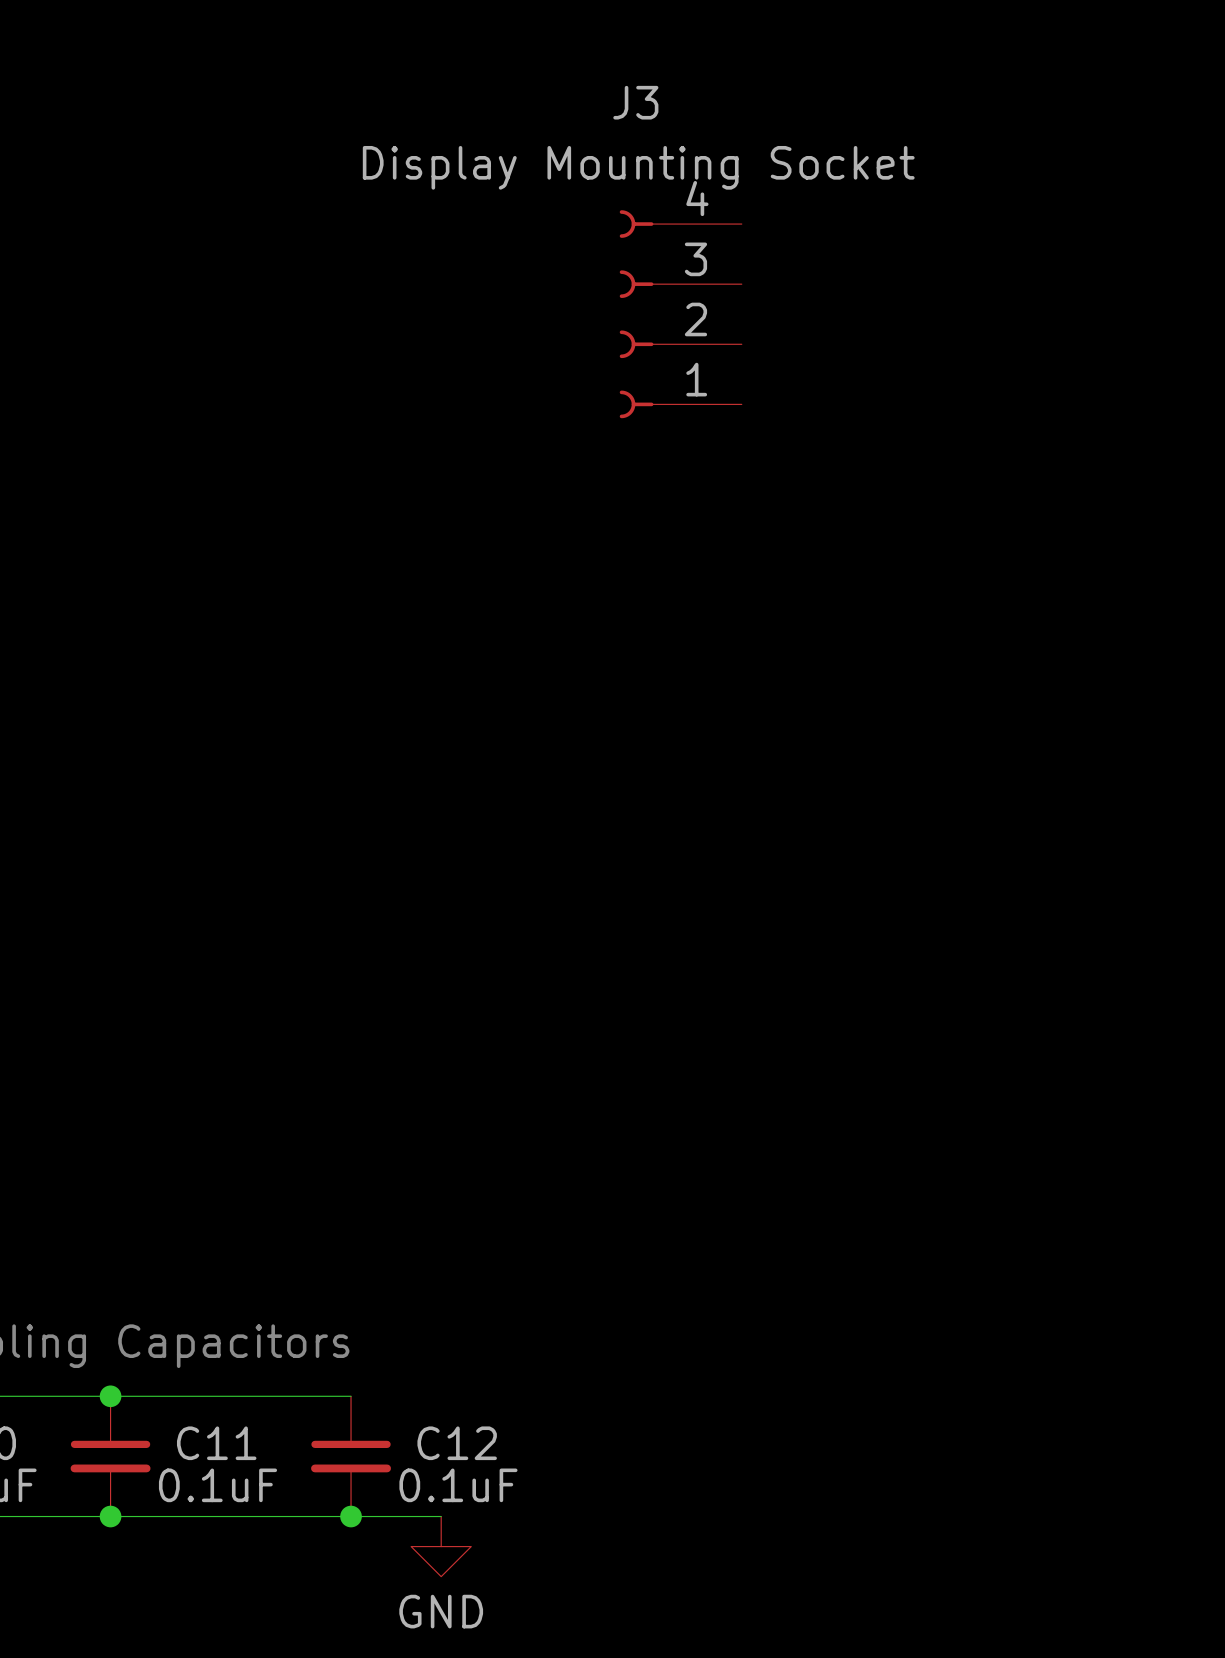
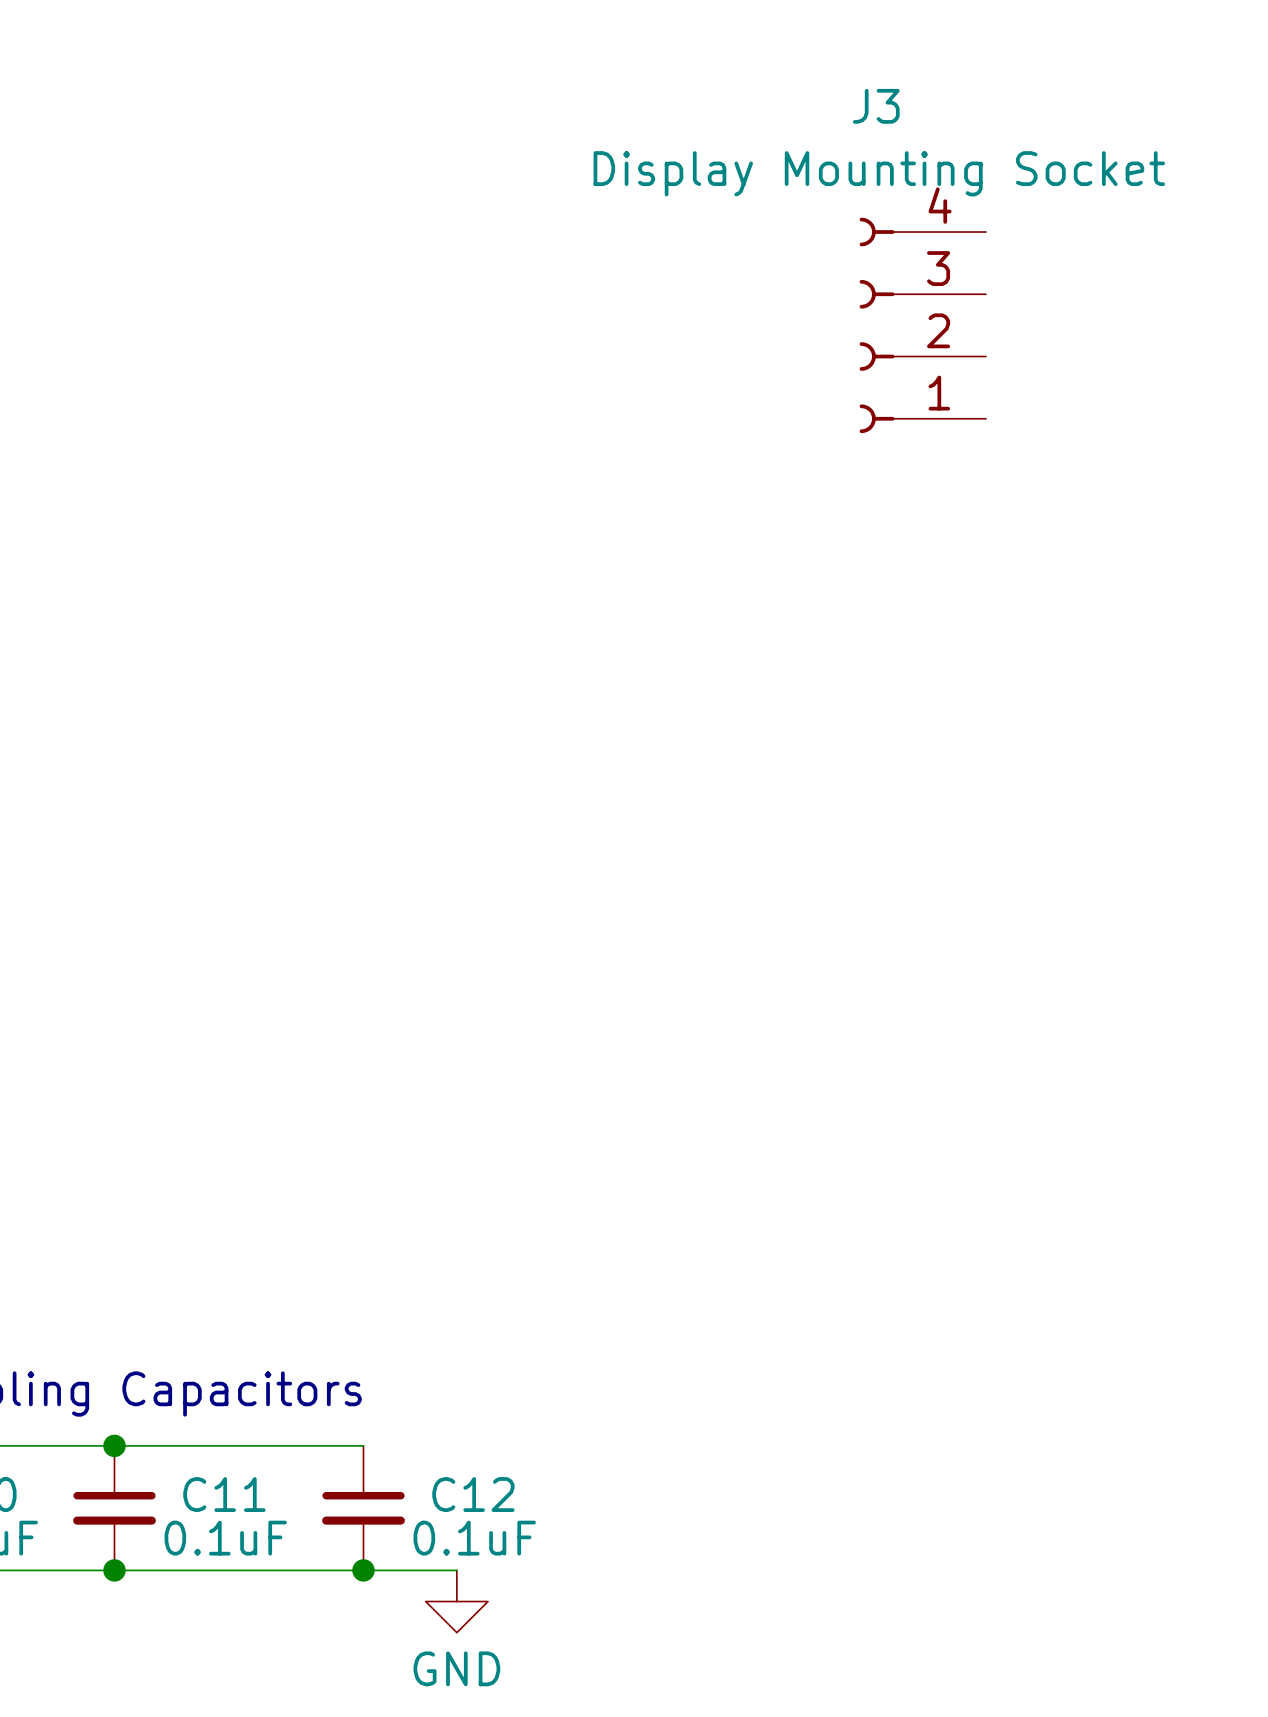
J3 position: (680, 314) -> (922, 325)

